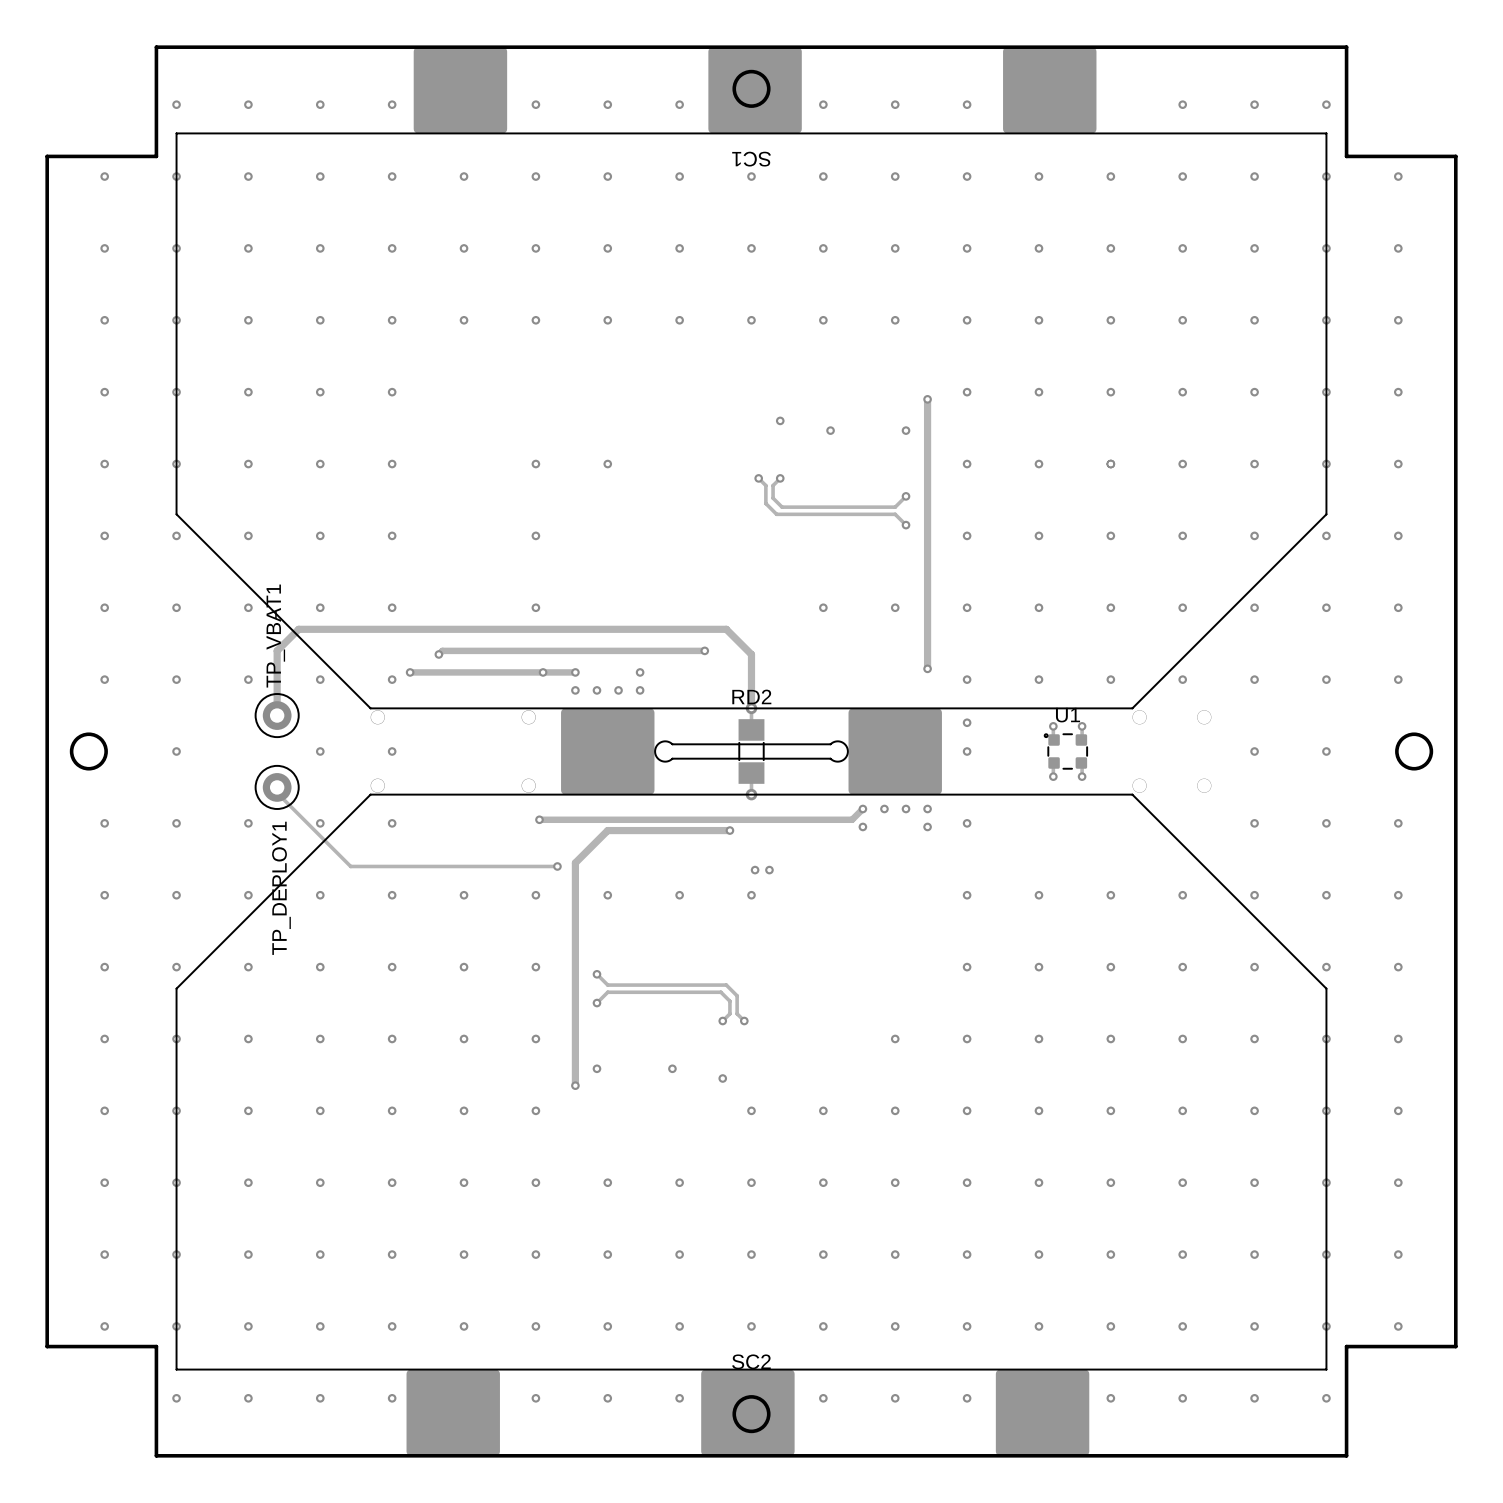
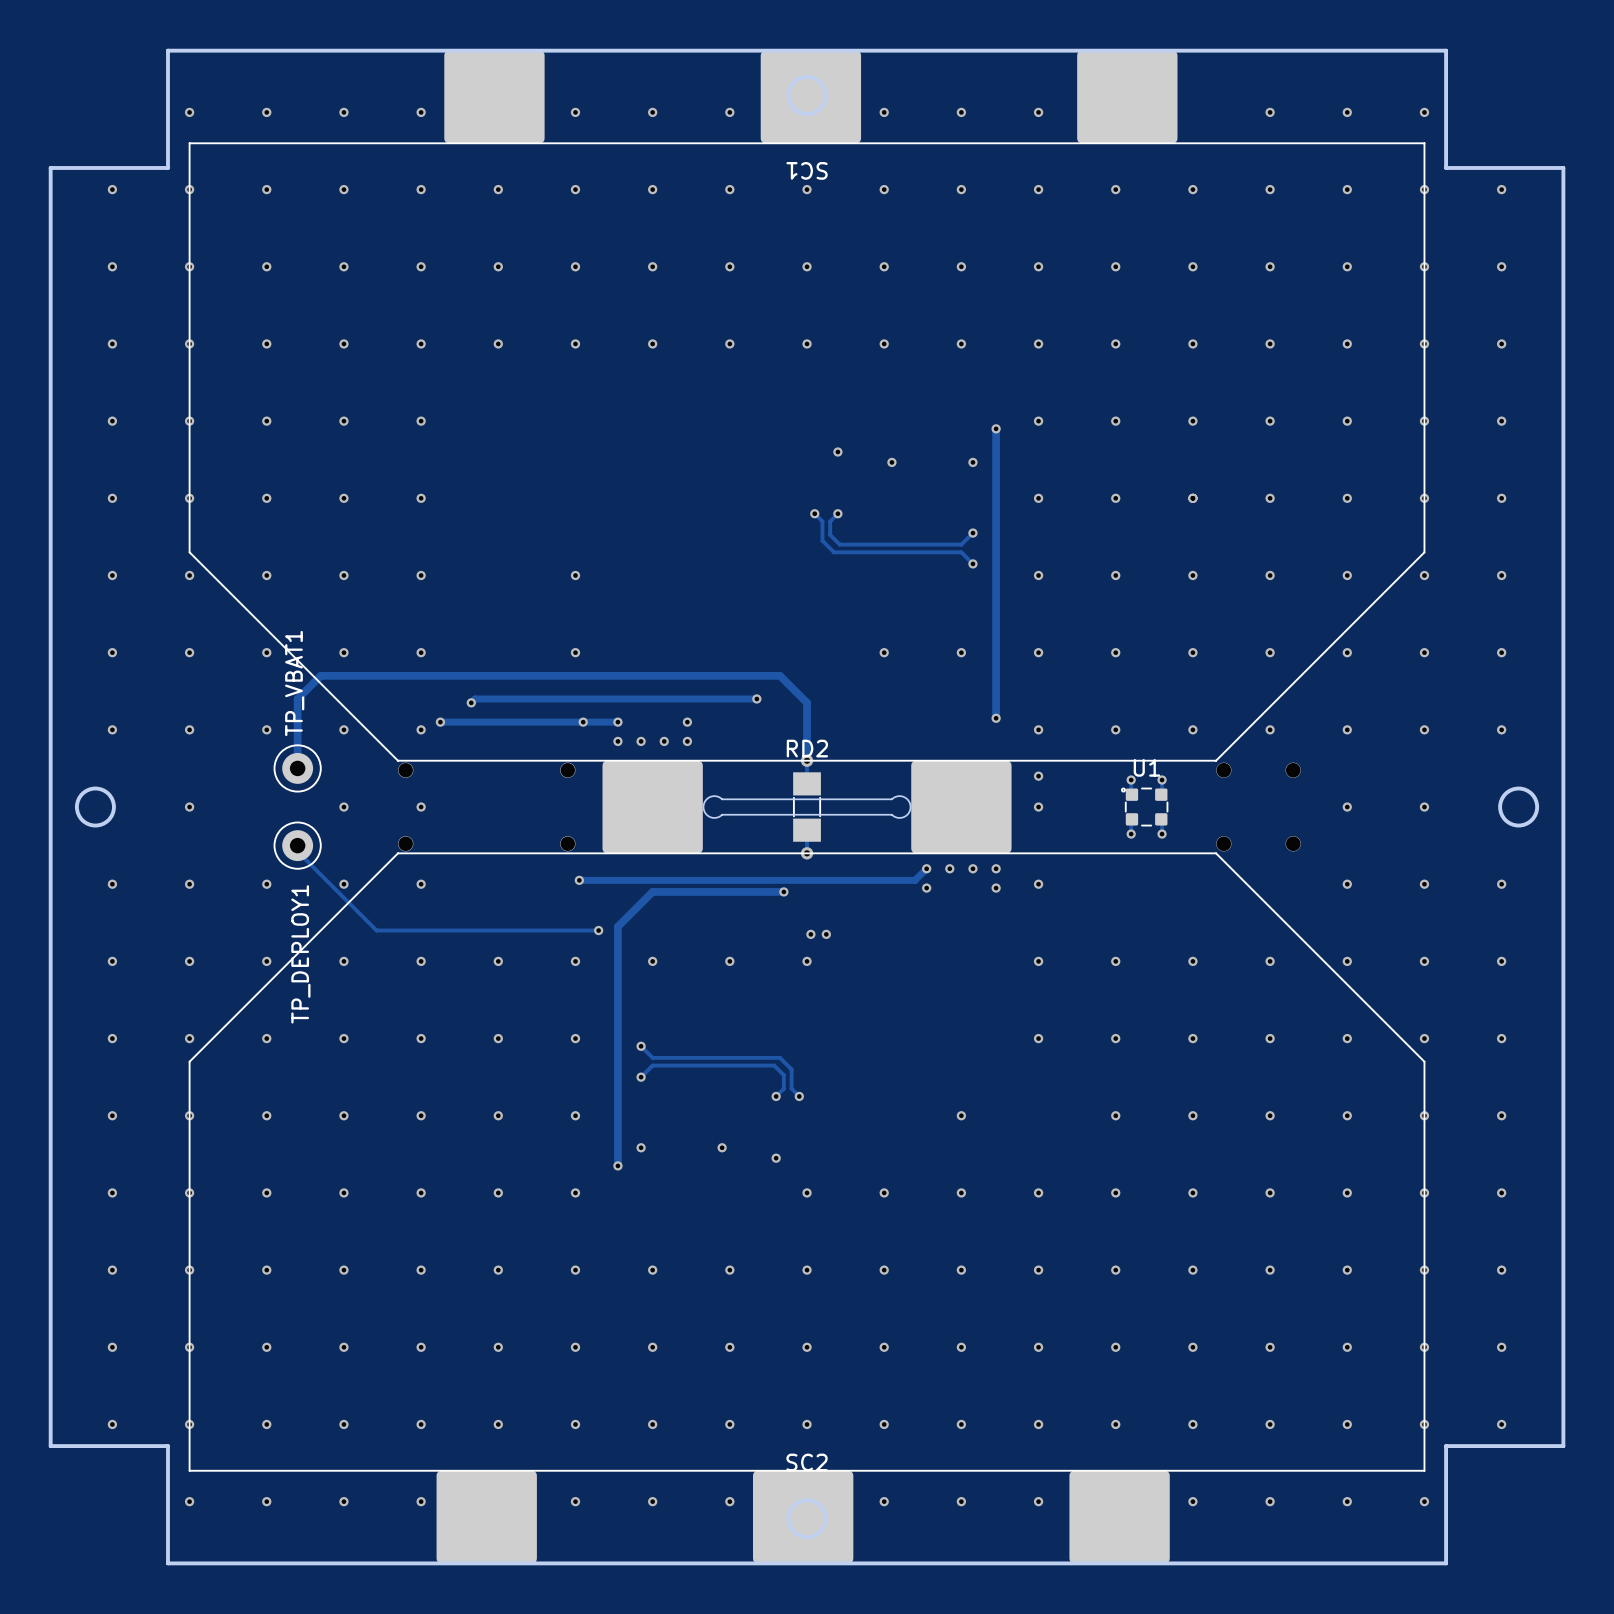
via: (535, 464) -> none
via: (607, 464) -> none
via: (967, 1038) -> none

